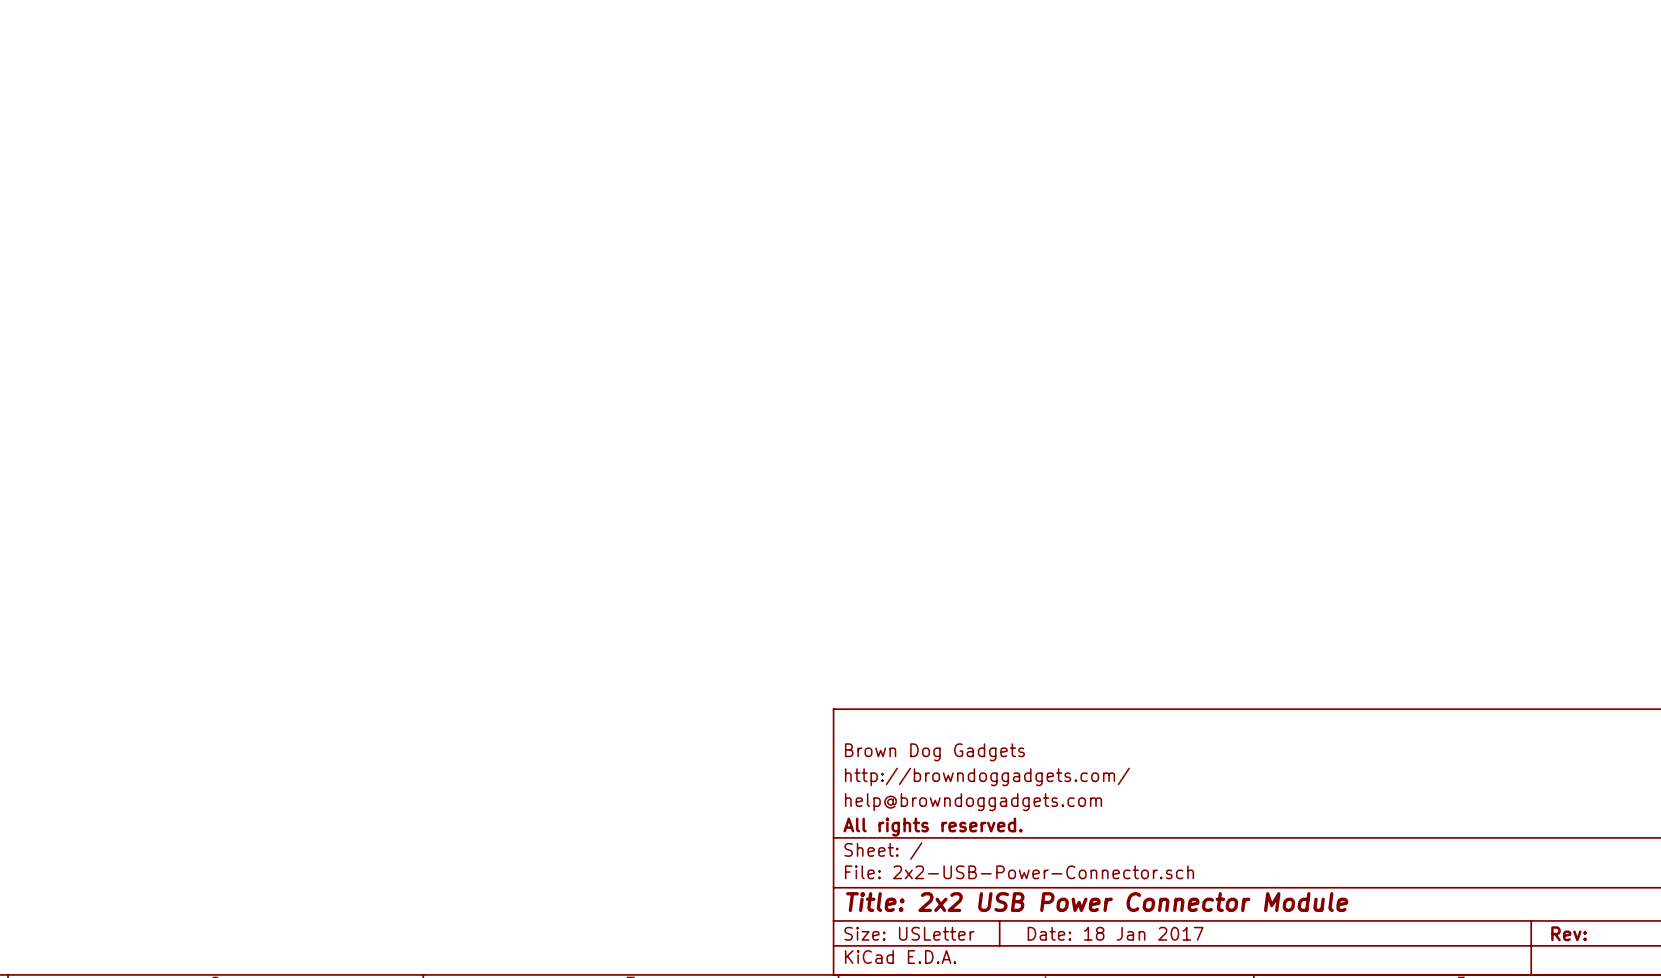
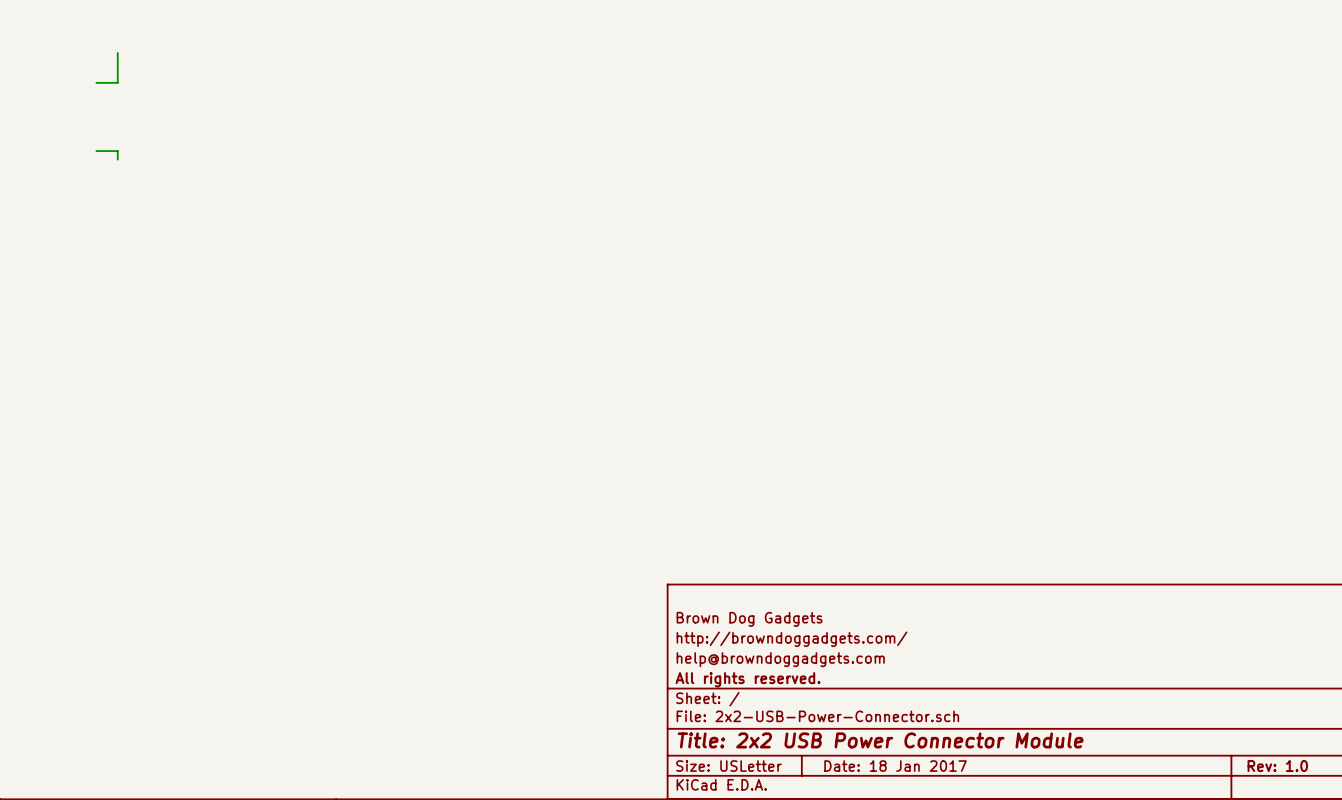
wire: none -> (117, 53) (117, 82) (96, 82)
wire: none -> (96, 151) (117, 151) (117, 159)
title block: Rev: (1569, 933) -> Rev: 1.0 (1277, 766)

